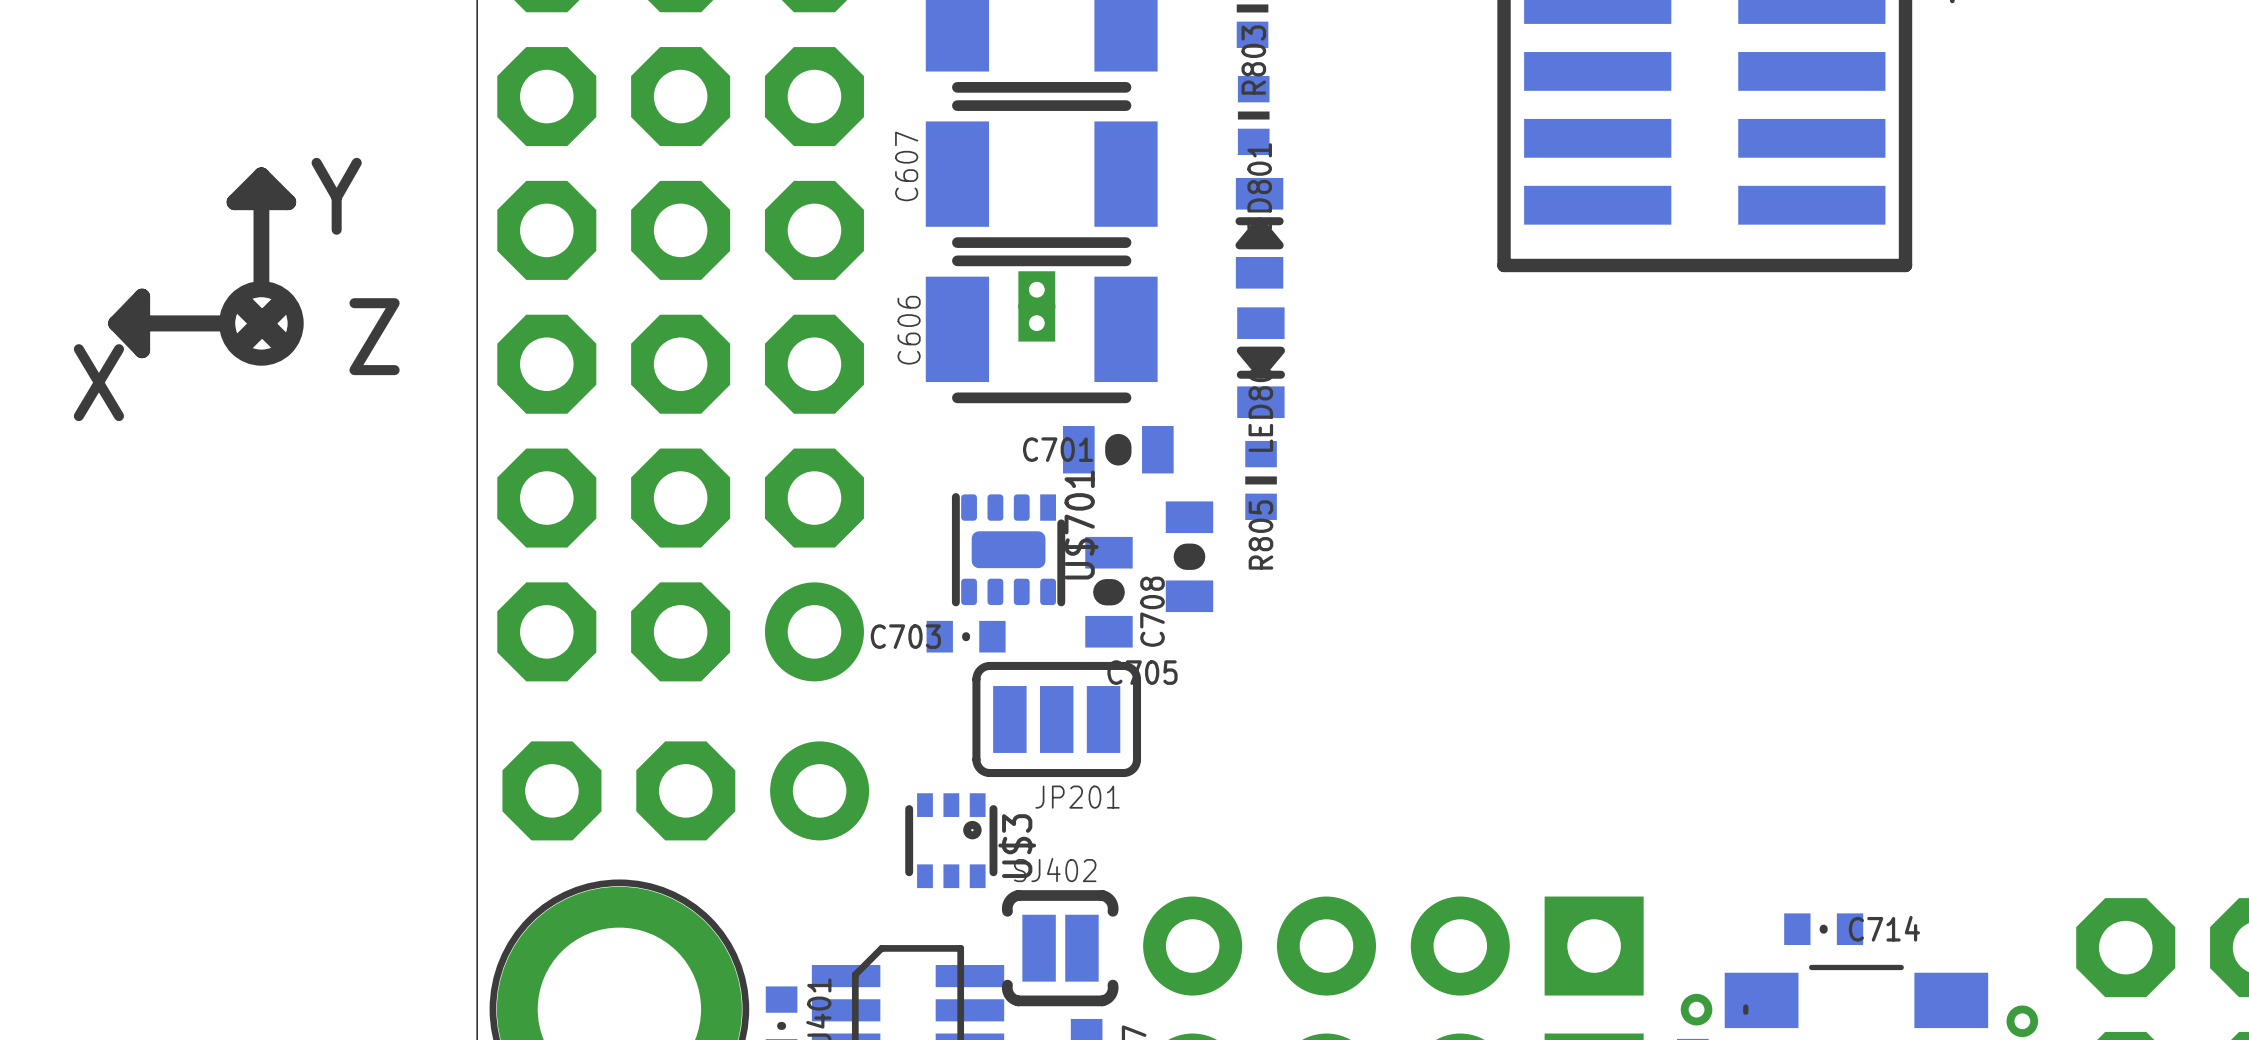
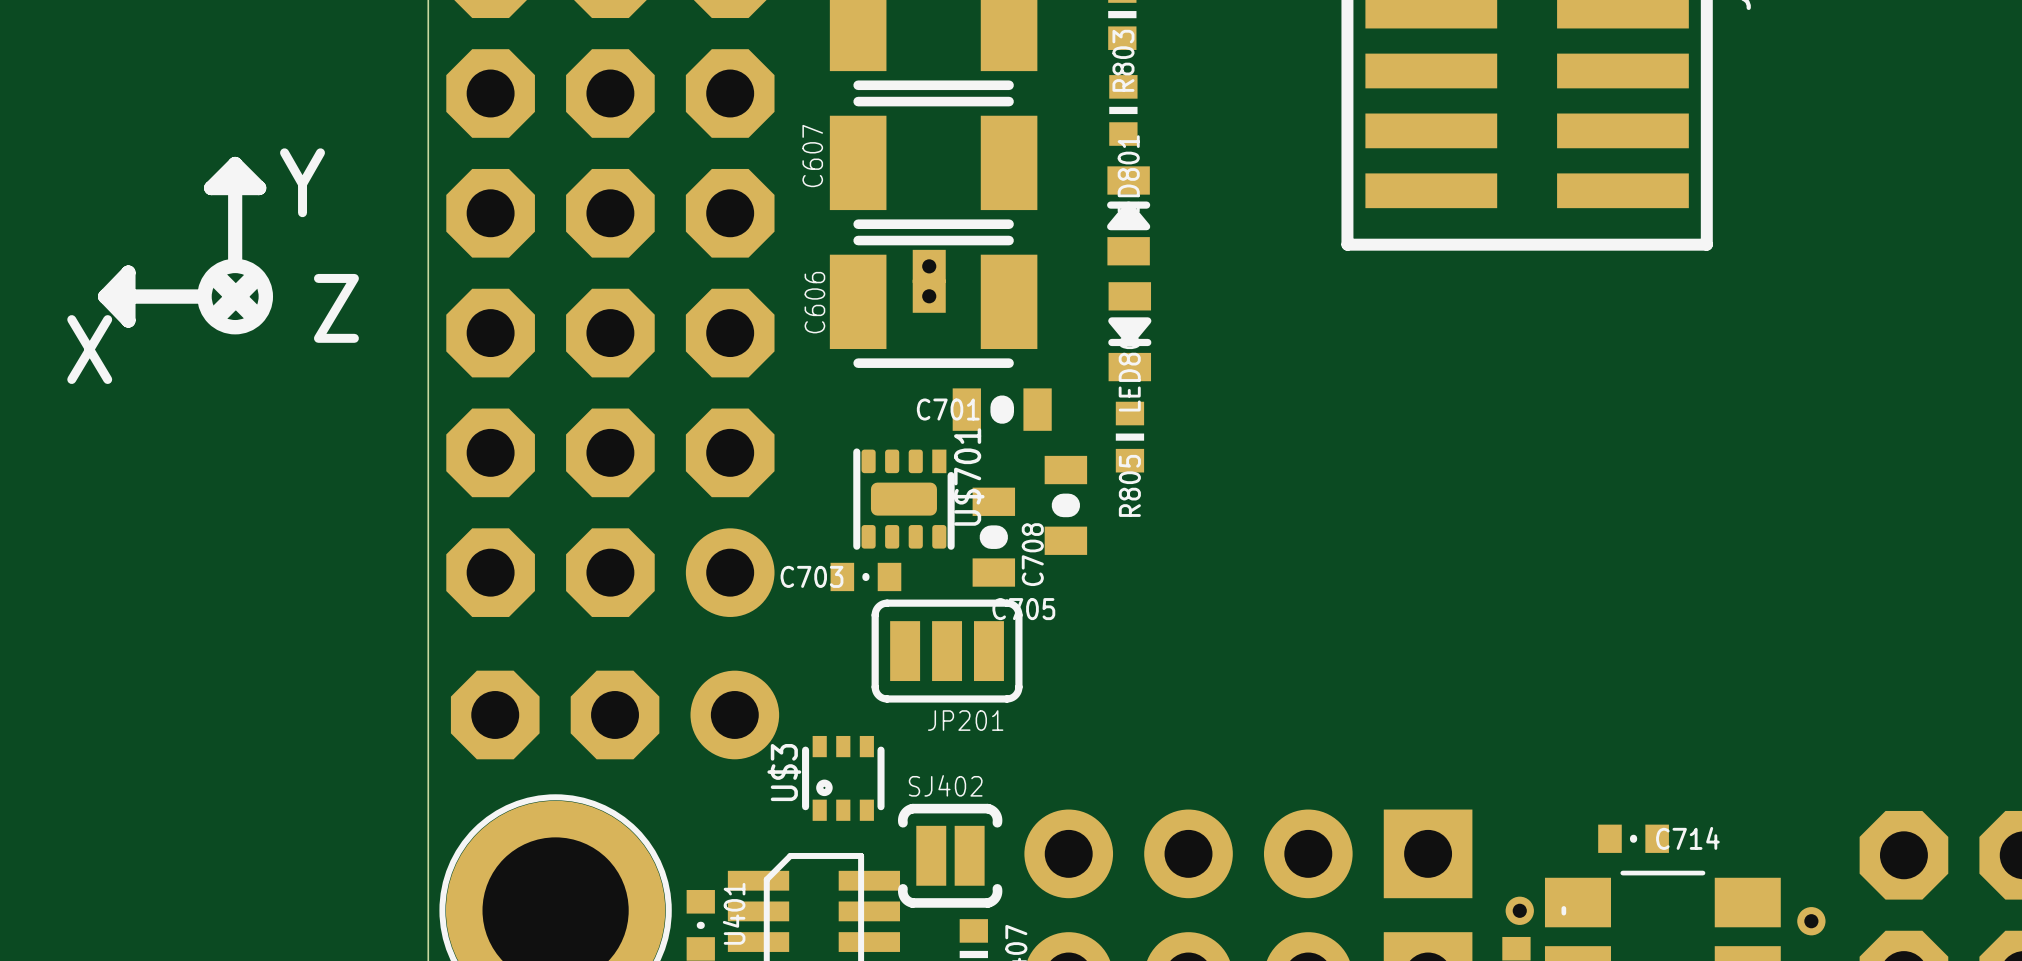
U$3 rotation: 0° (951, 840) -> 180° (843, 778)

